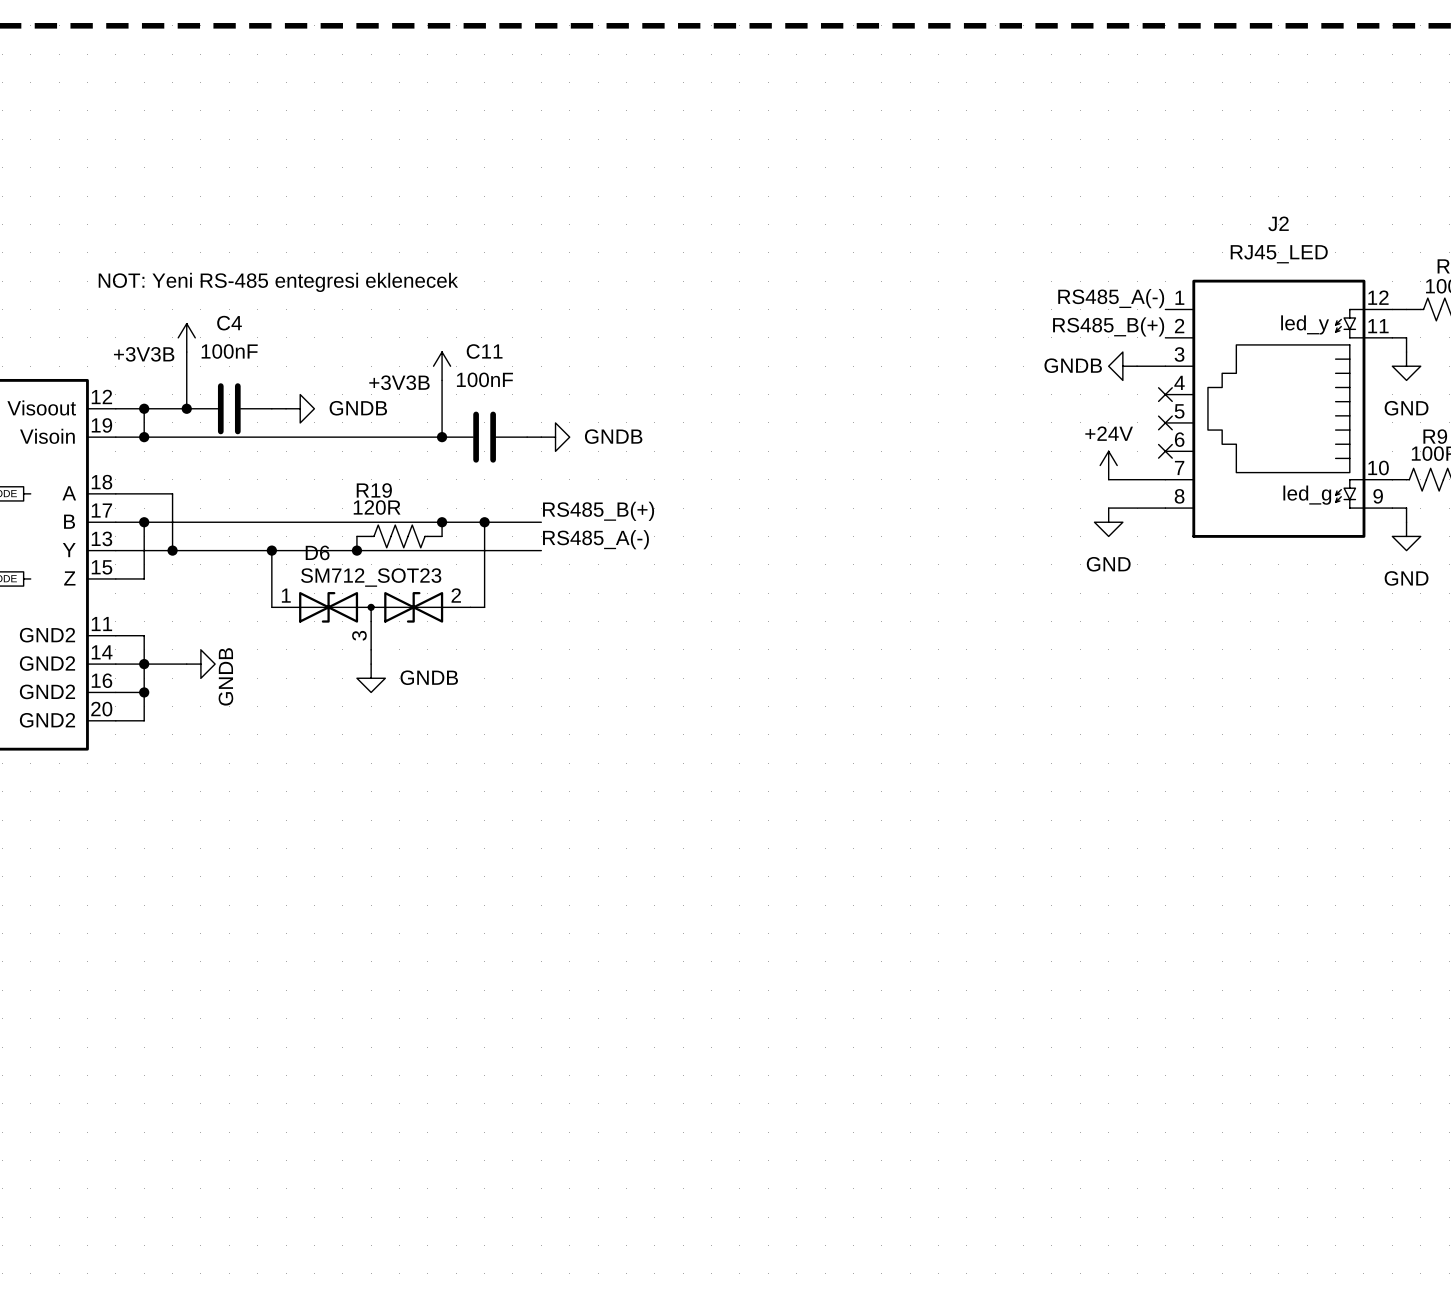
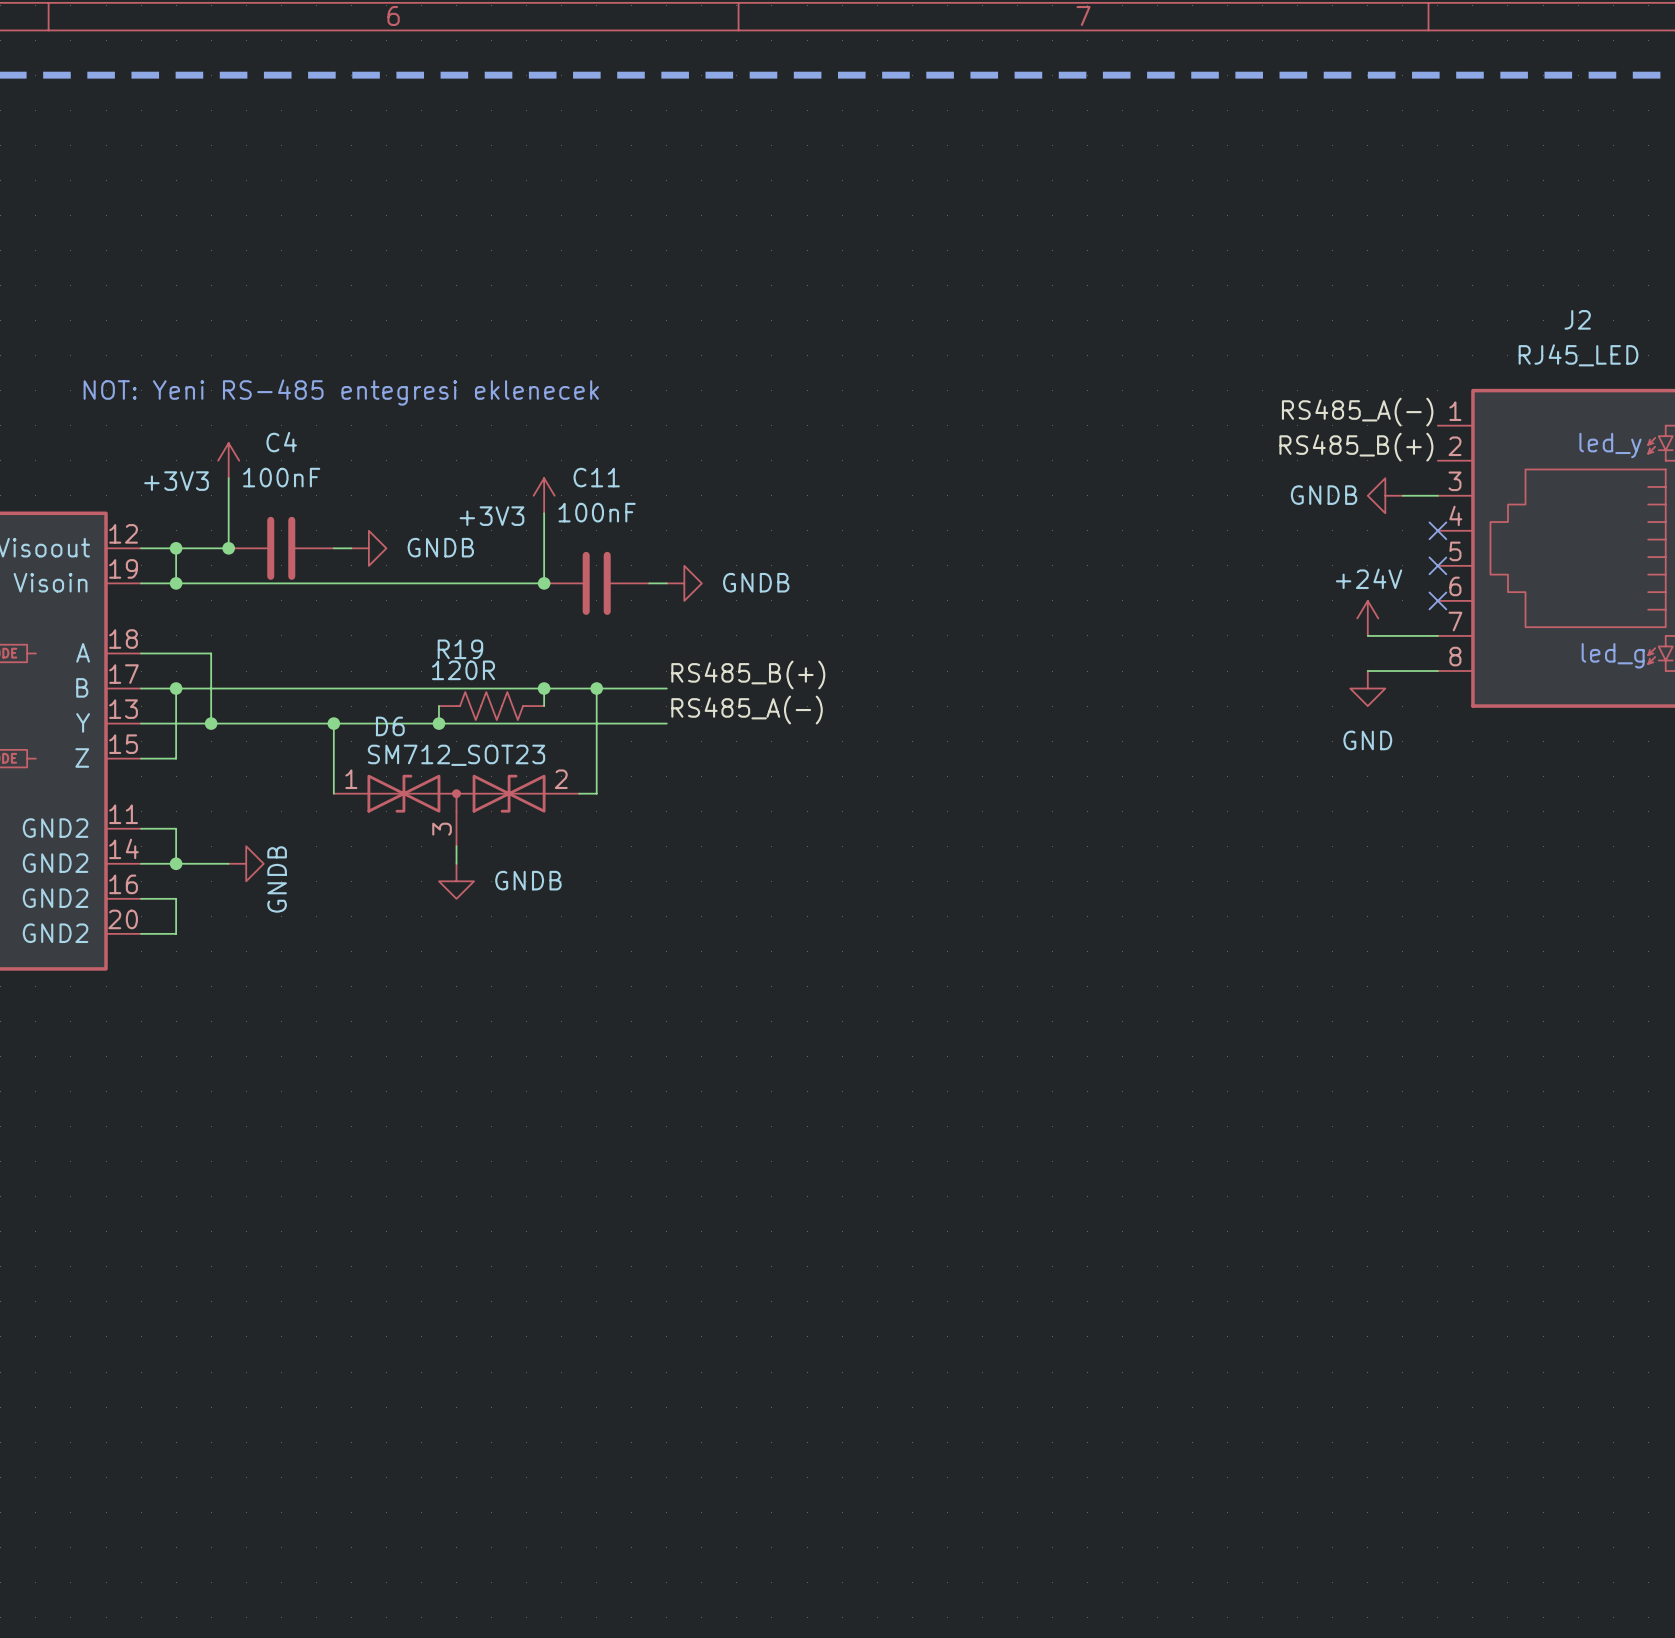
power symbol: +3V3B (186, 337) -> +3V3 (228, 460)
power symbol: +3V3B (442, 366) -> +3V3 (544, 495)
wire: (144, 664) (144, 692) -> none
junction: (144, 692) -> none

